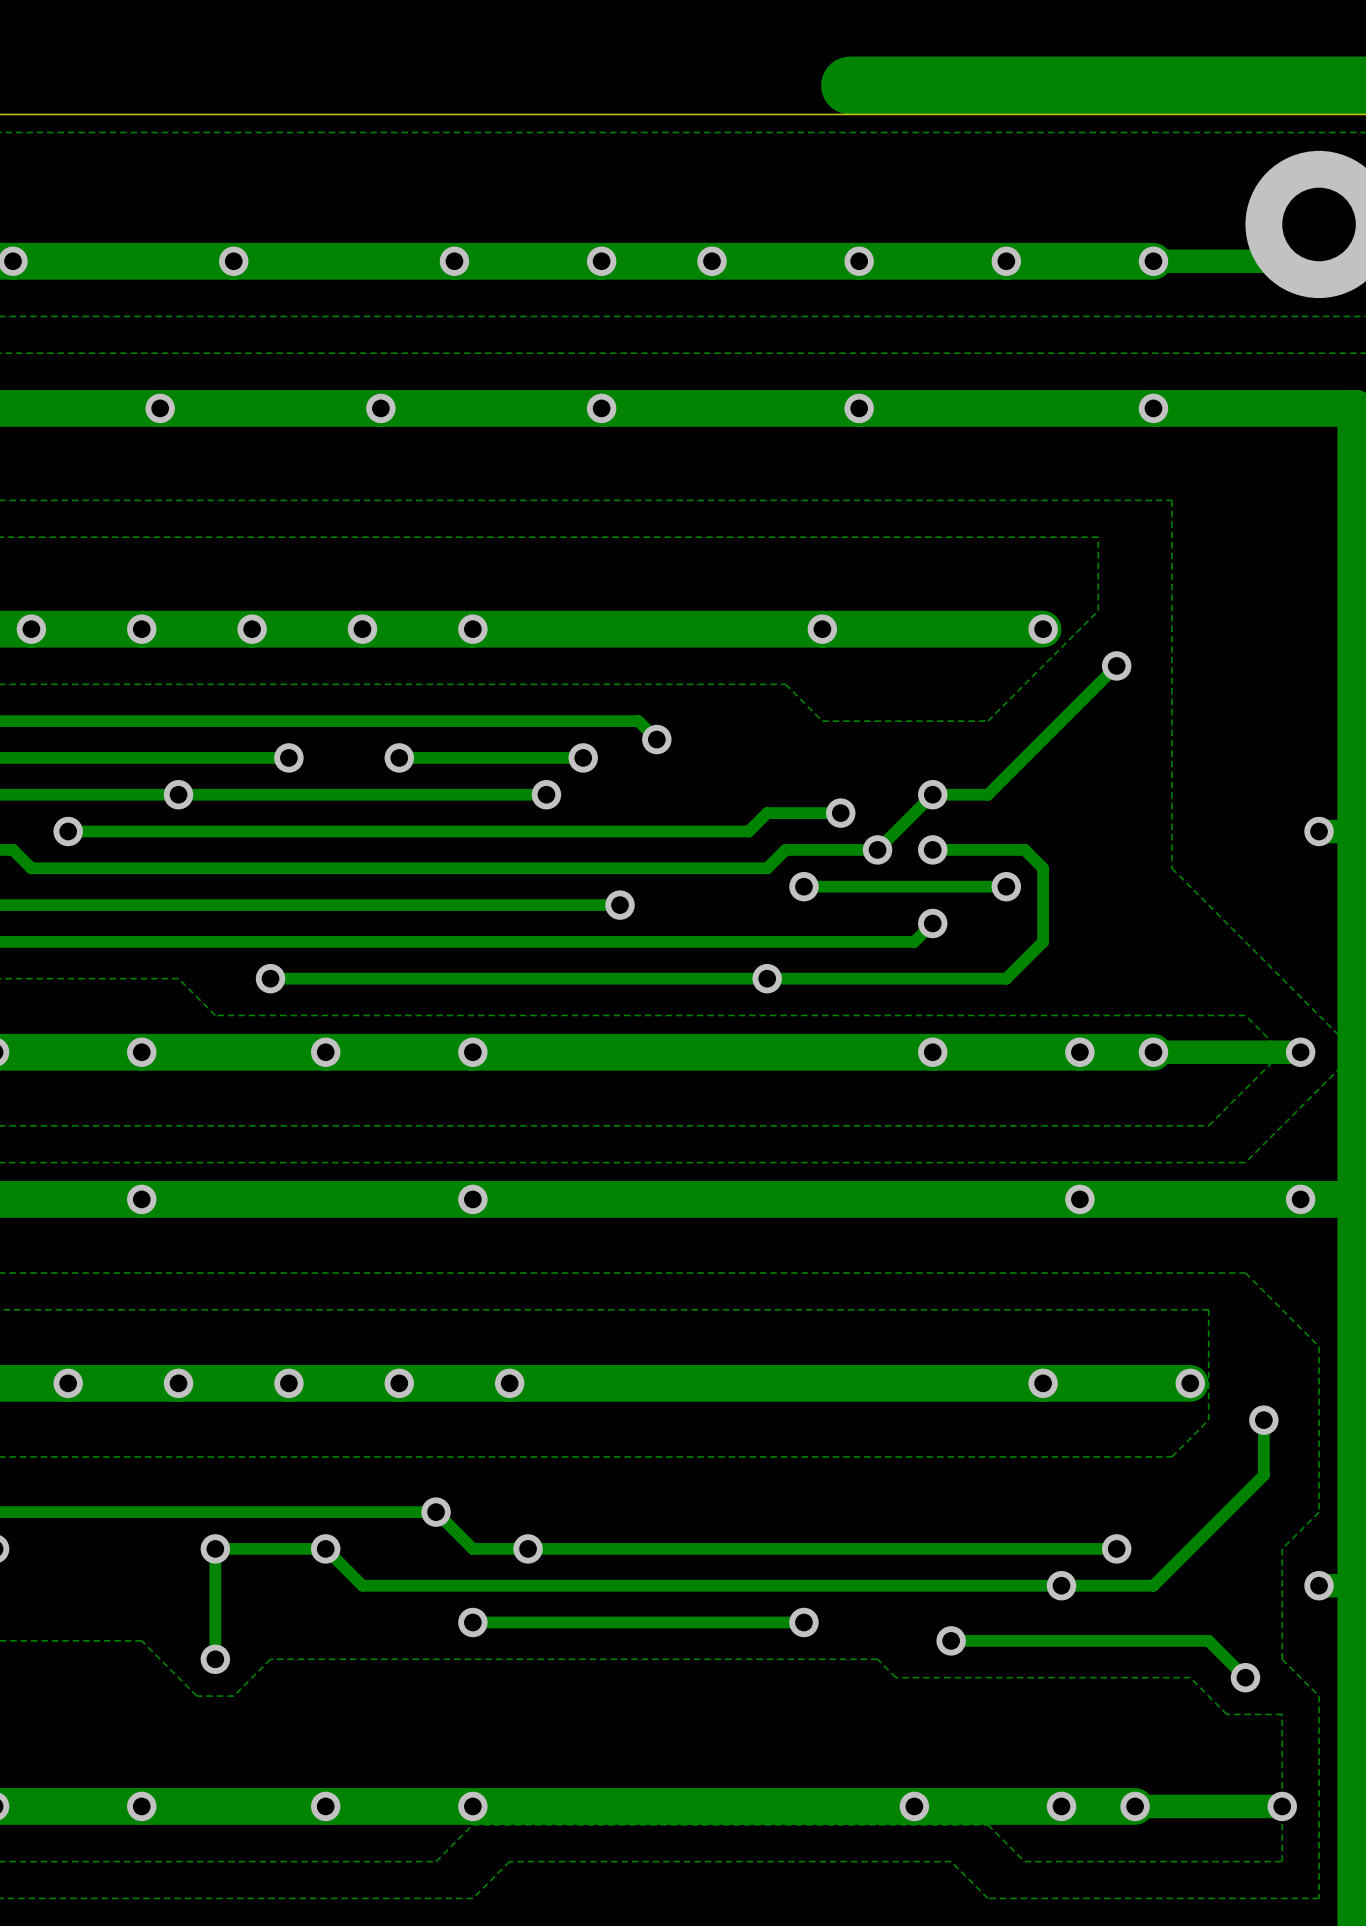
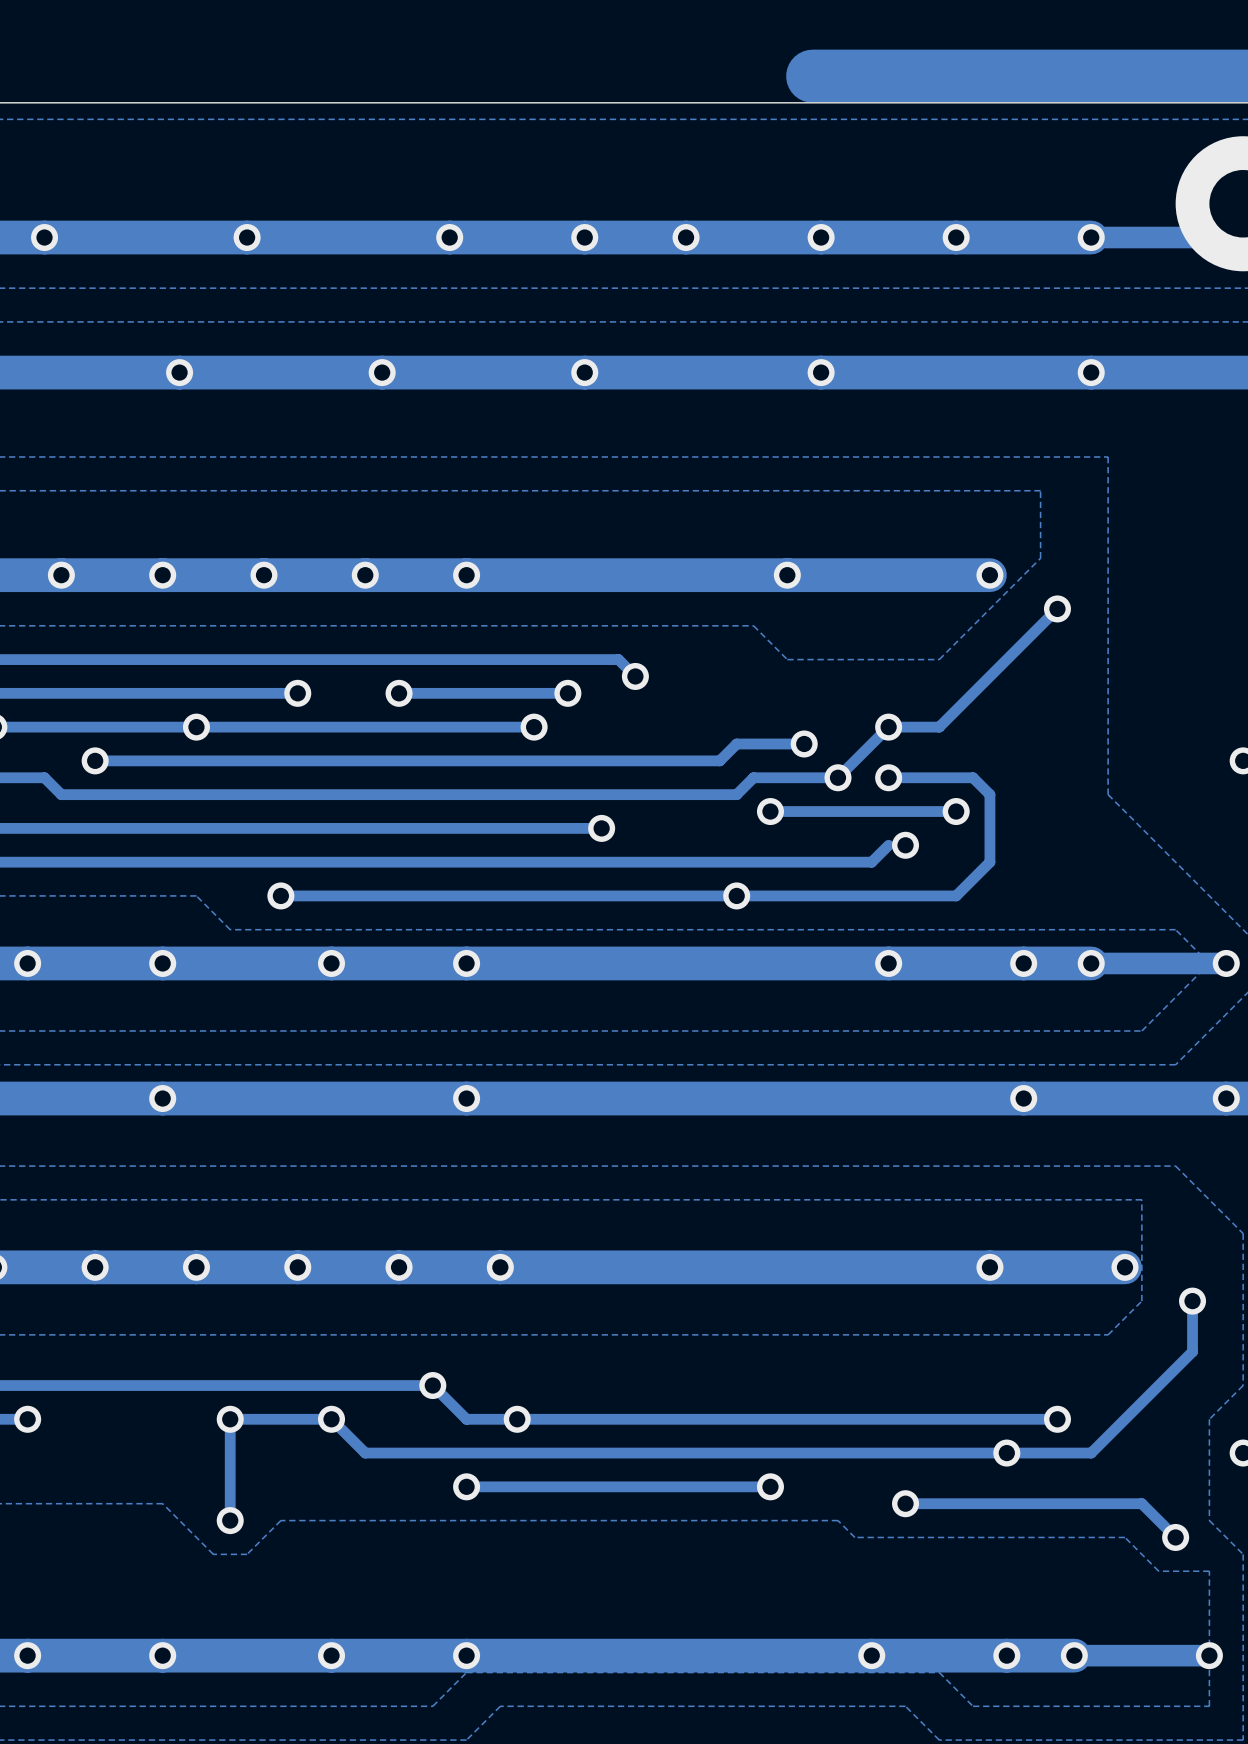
via position: (932, 923) -> (905, 845)

